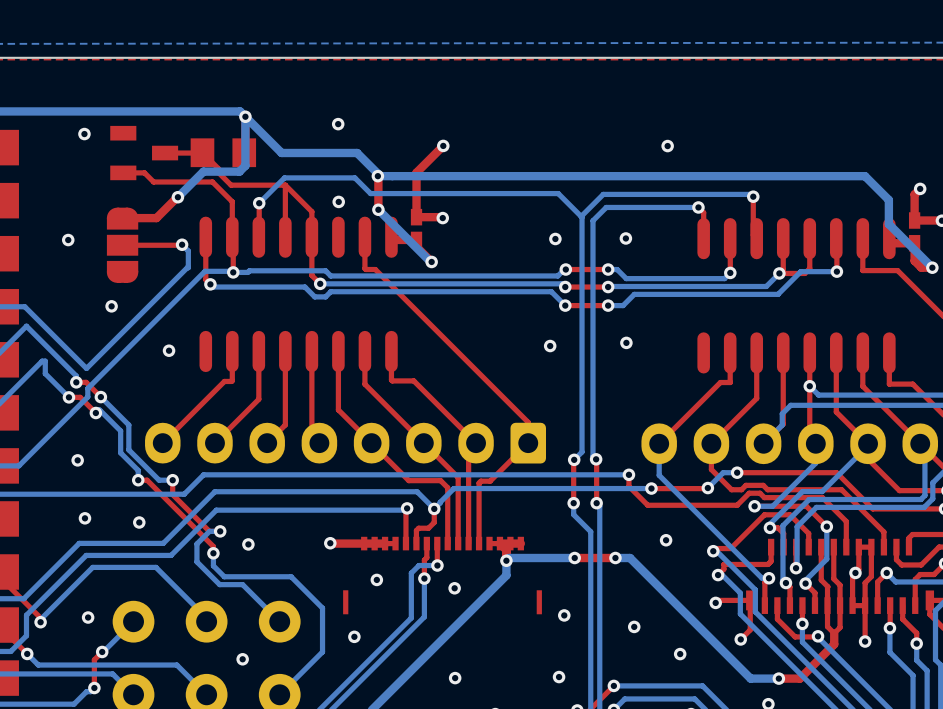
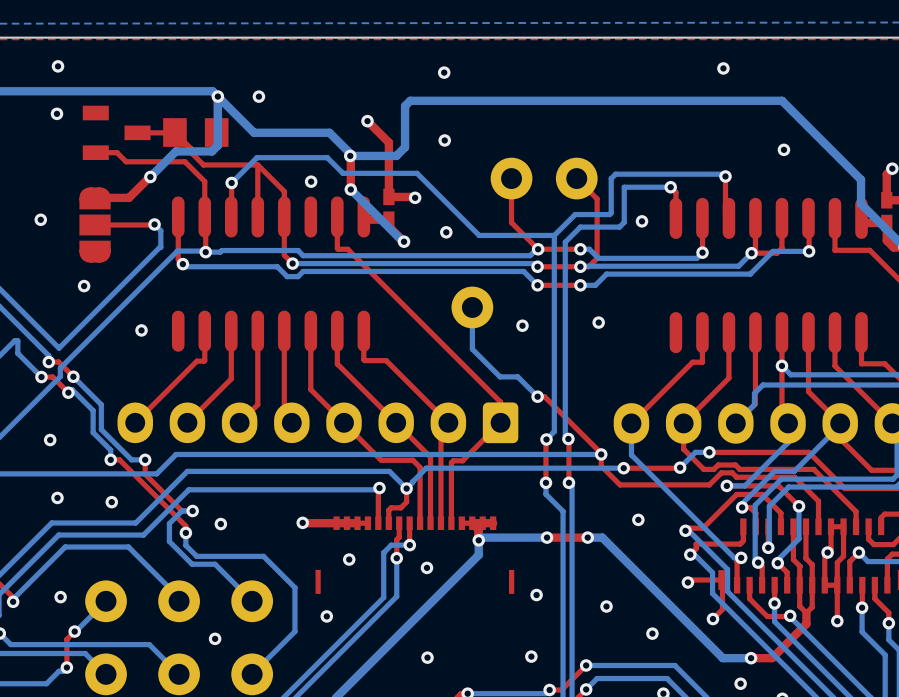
via: none -> (58, 66)
via: none -> (723, 68)
via: none -> (444, 72)
via: none -> (258, 96)
via: (338, 124) -> none
via: none -> (367, 121)
top track: (443, 145) (416, 172) -> (367, 121) (388, 142) (388, 152)
via: (443, 145) -> none
via: (667, 146) -> none
via: none -> (444, 140)
via: none -> (783, 149)
bottom track: (865, 176) (424, 176) -> (837, 155) (782, 100) (410, 100) (405, 106) (405, 147) (396, 155)
bottom track: (444, 193) (558, 193) (582, 217) (582, 255) -> (417, 173) (479, 235) (554, 235) (575, 214) (609, 214) (611, 178) (615, 174)
bottom track: (643, 194) (603, 194) (581, 216) -> none
top track: none -> (511, 178) (511, 222) (538, 249)
part: none -> (511, 178)
top track: none -> (576, 178) (597, 198) (597, 258) (588, 266) (580, 266)
part: none -> (576, 178)
bottom track: (651, 207) (606, 207) (592, 220) (592, 262) -> (624, 187) (624, 222) (619, 227) (580, 227) (565, 242)
via: (555, 238) -> none
via position: (625, 238) -> (642, 221)
via: none -> (446, 232)
bottom track: none -> (472, 307) (472, 349) (500, 376) (517, 376) (537, 396)
part: none -> (472, 307)
top track: none -> (537, 396) (544, 396) (601, 454)
via: none -> (537, 396)

